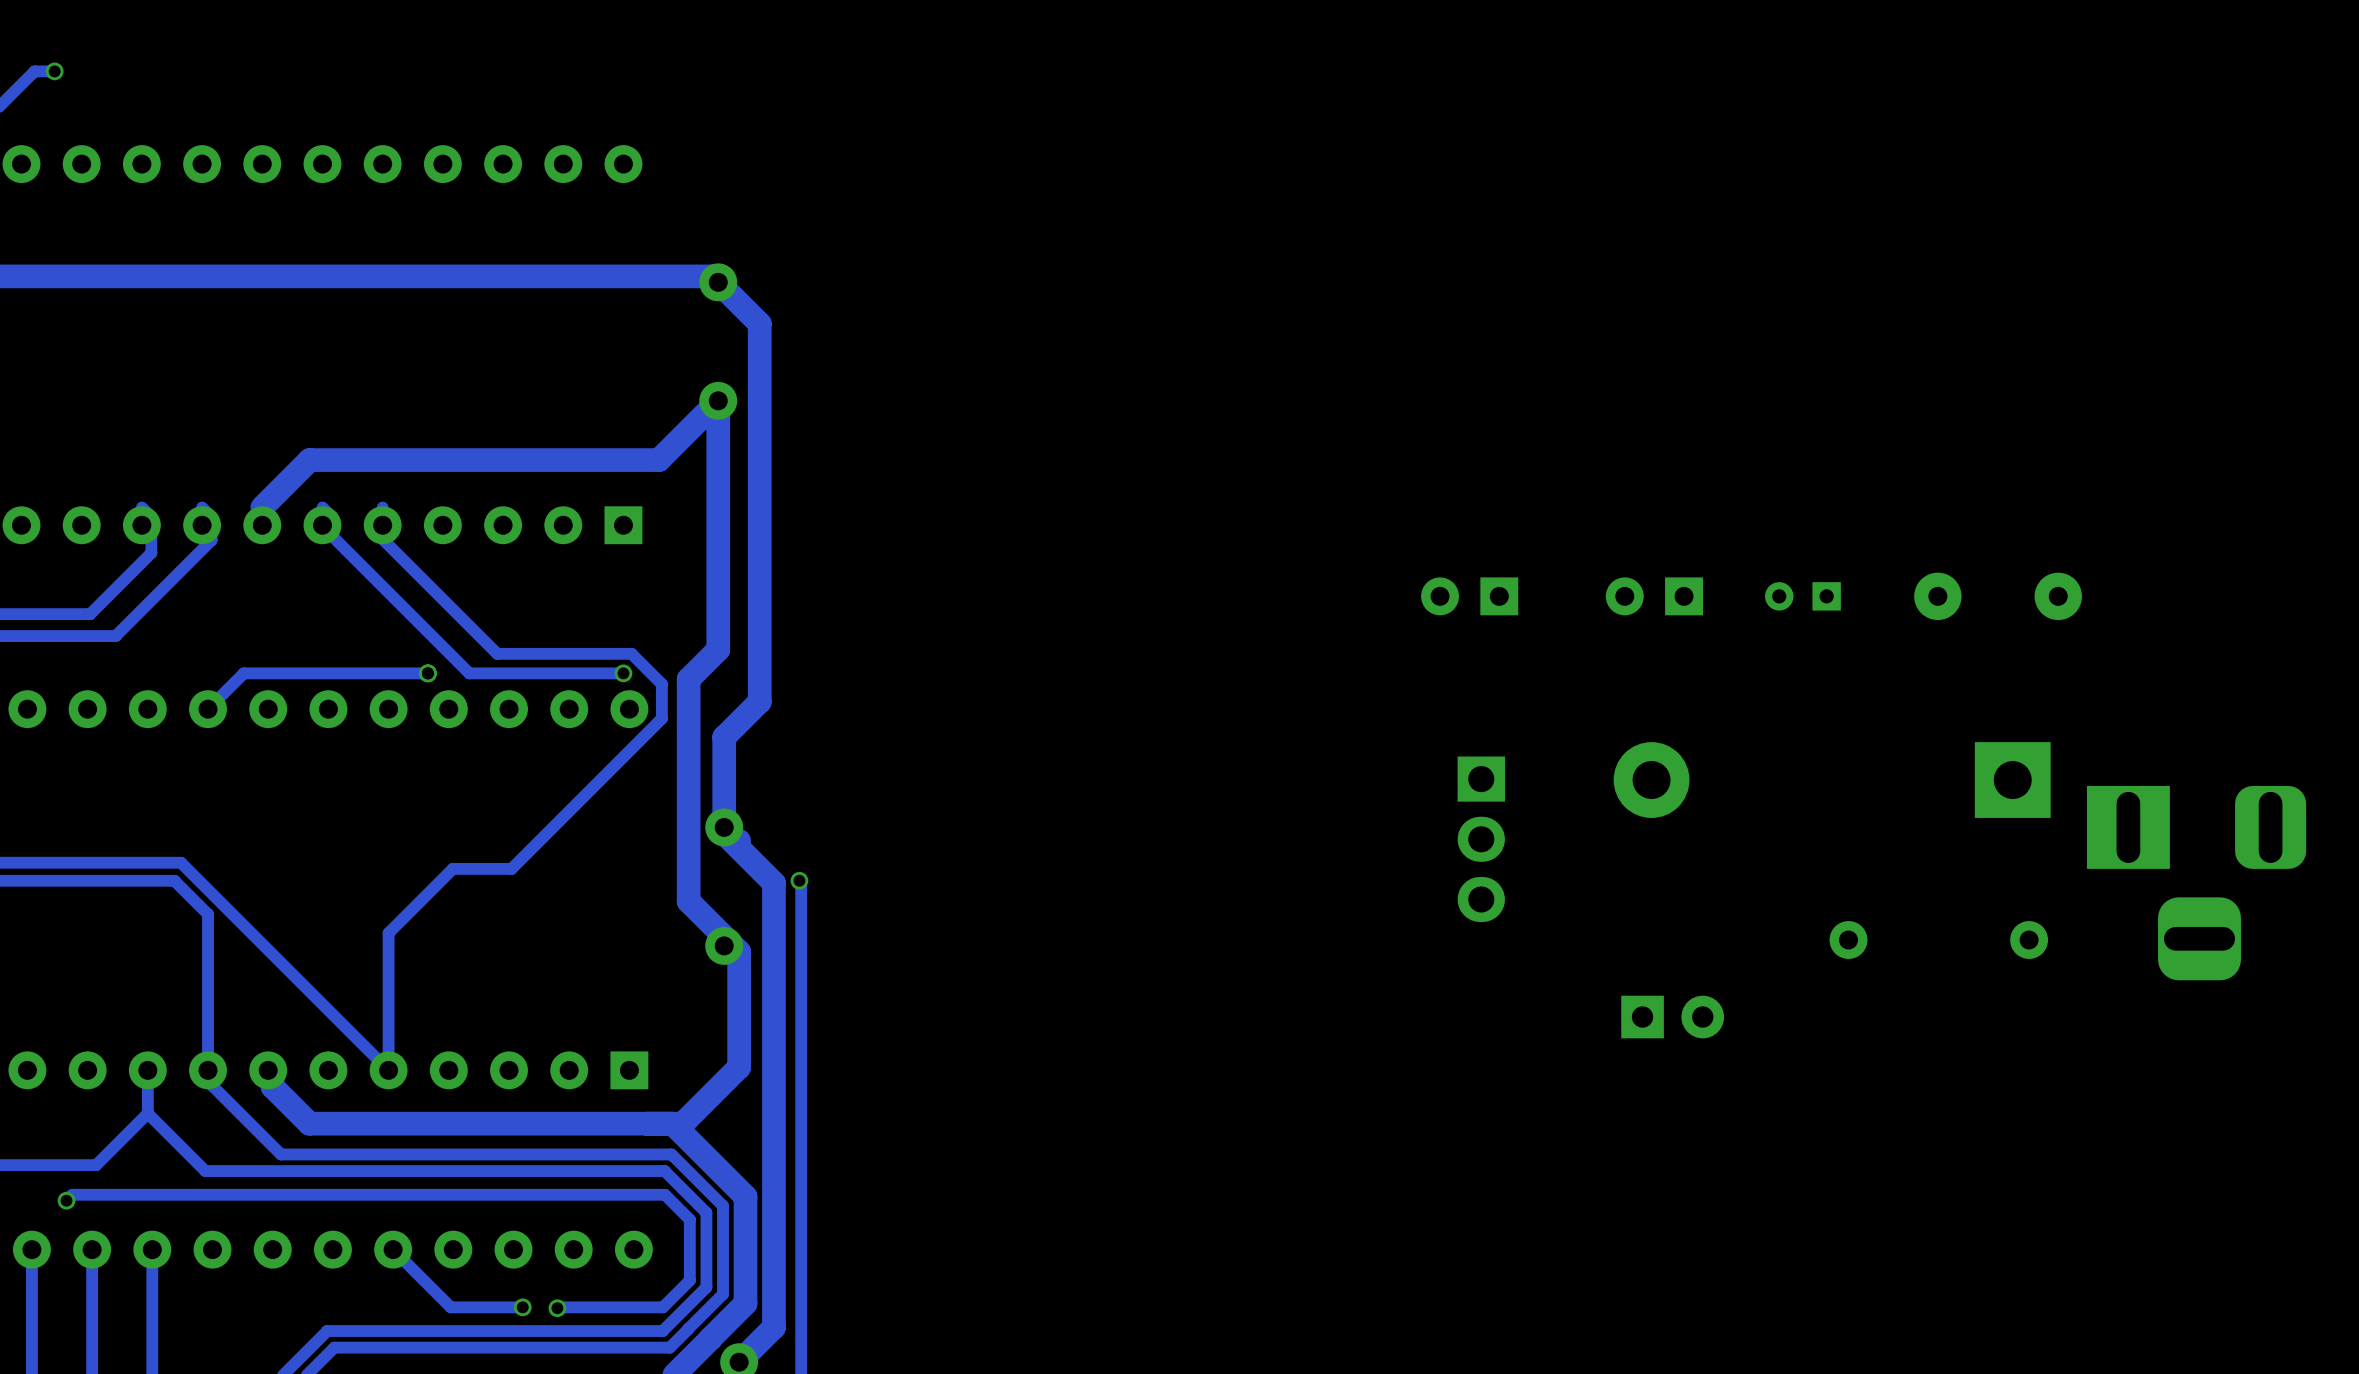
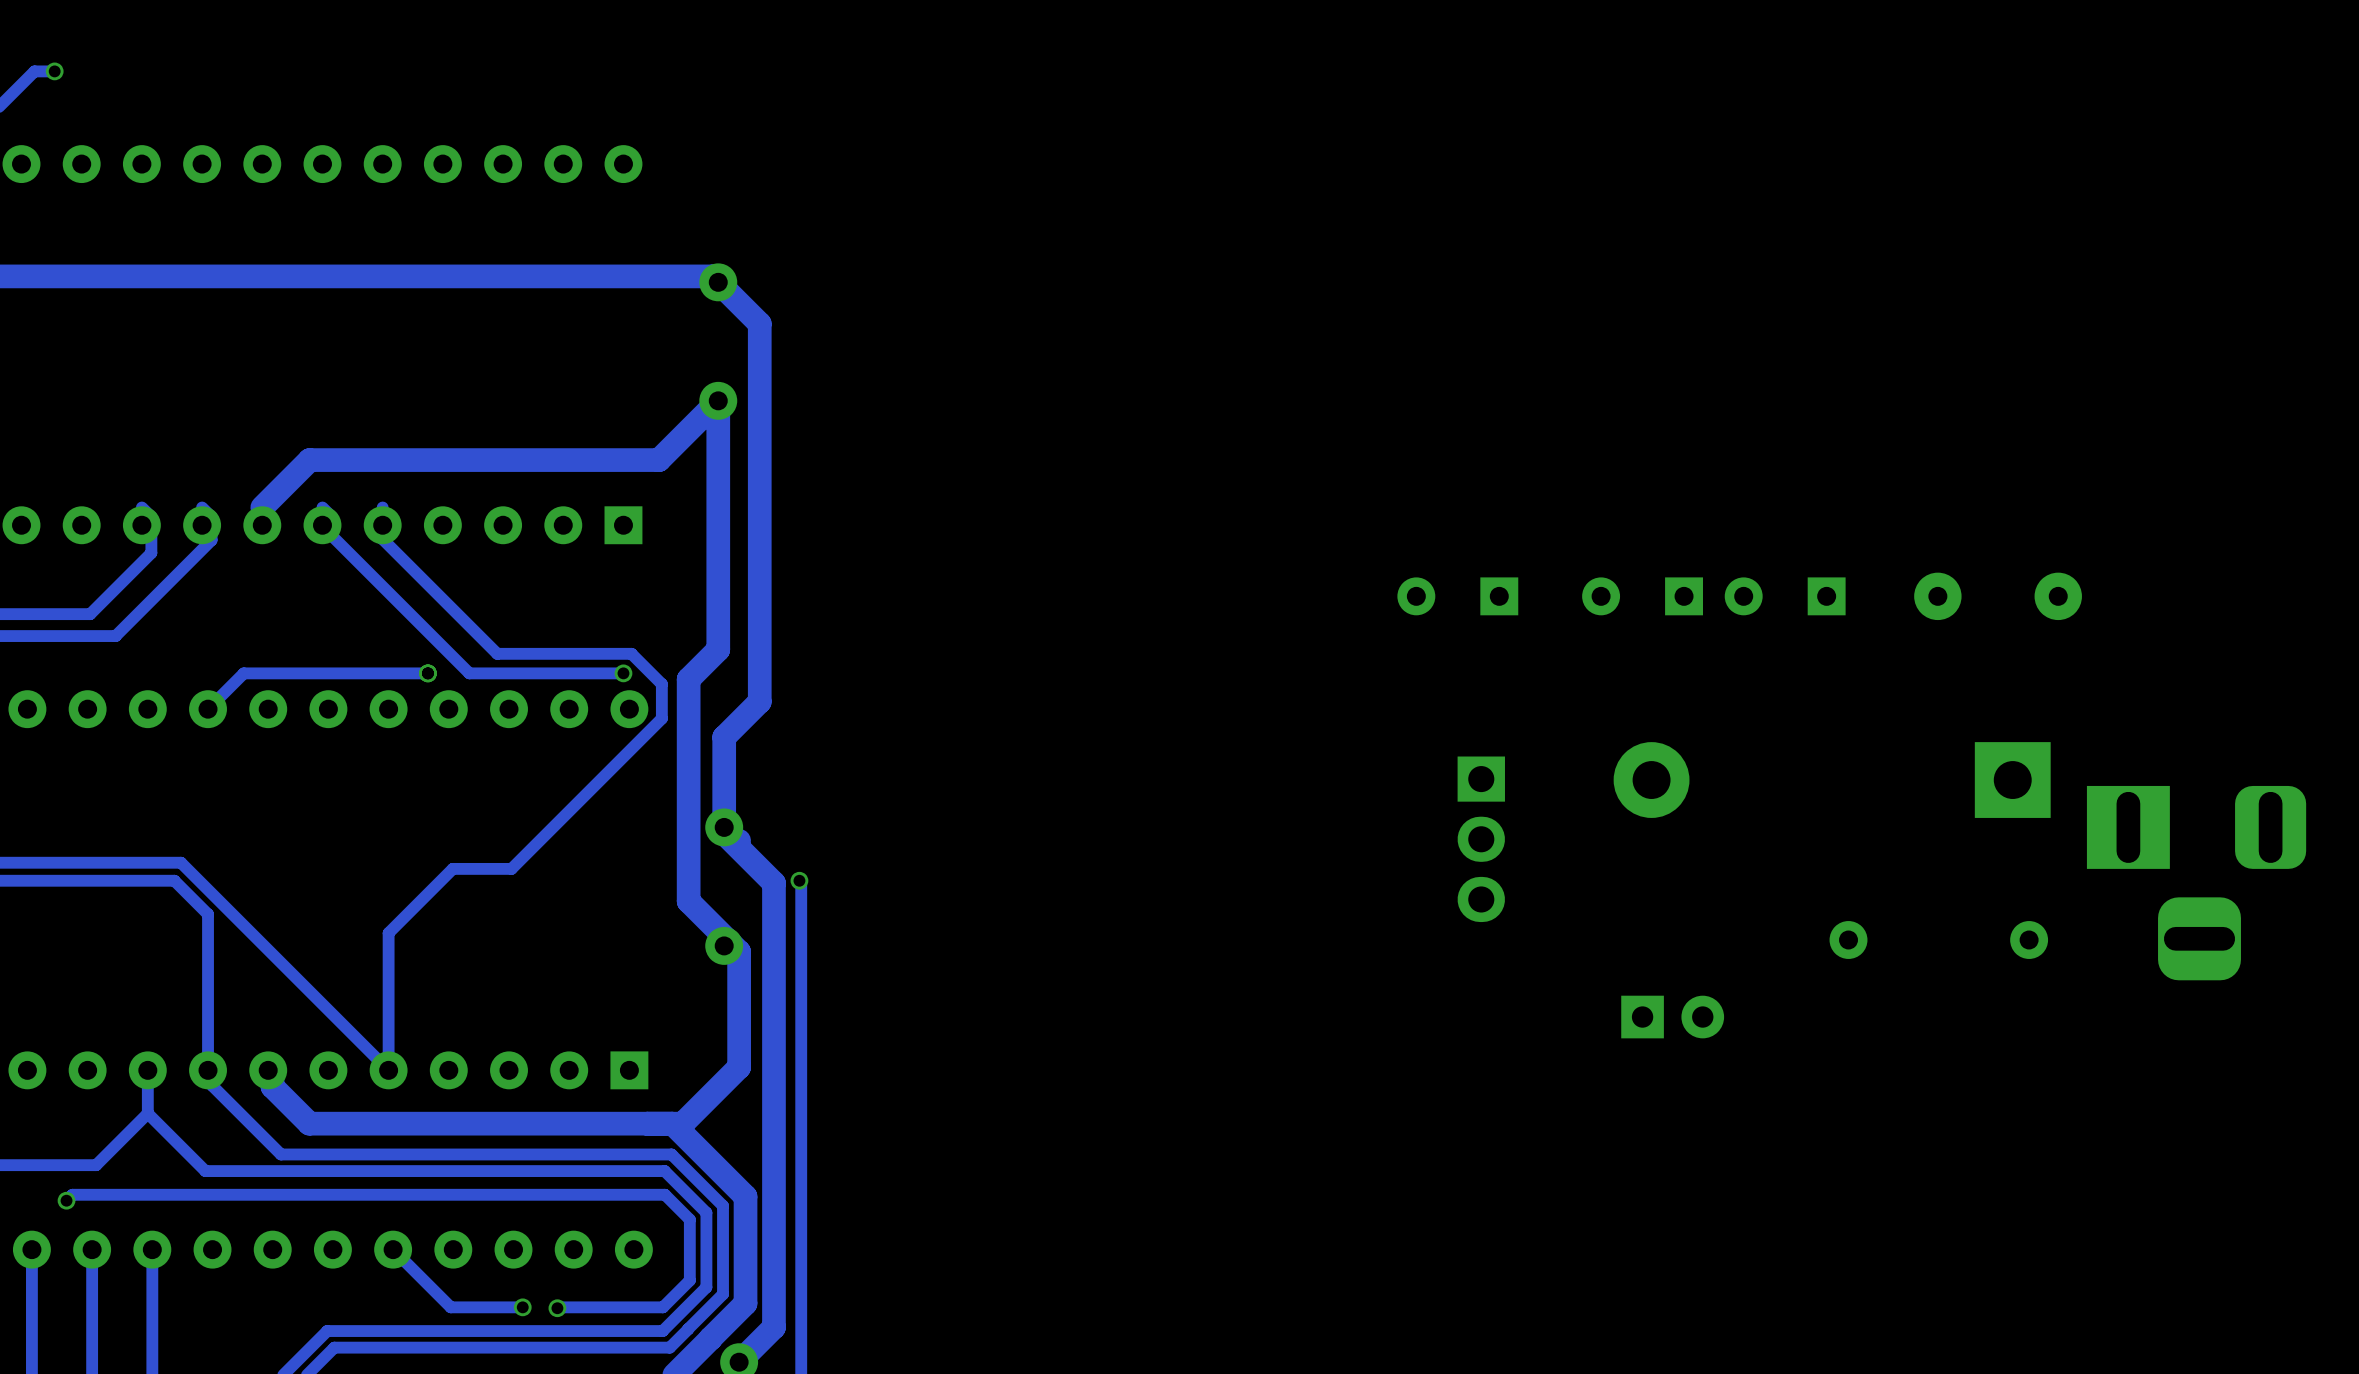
part footprint: [1421, 577, 1519, 616] -> [1397, 577, 1519, 616]
part footprint: [1605, 577, 1703, 616] -> [1582, 577, 1703, 616]
part footprint: [1765, 582, 1841, 611] -> [1724, 577, 1846, 616]

